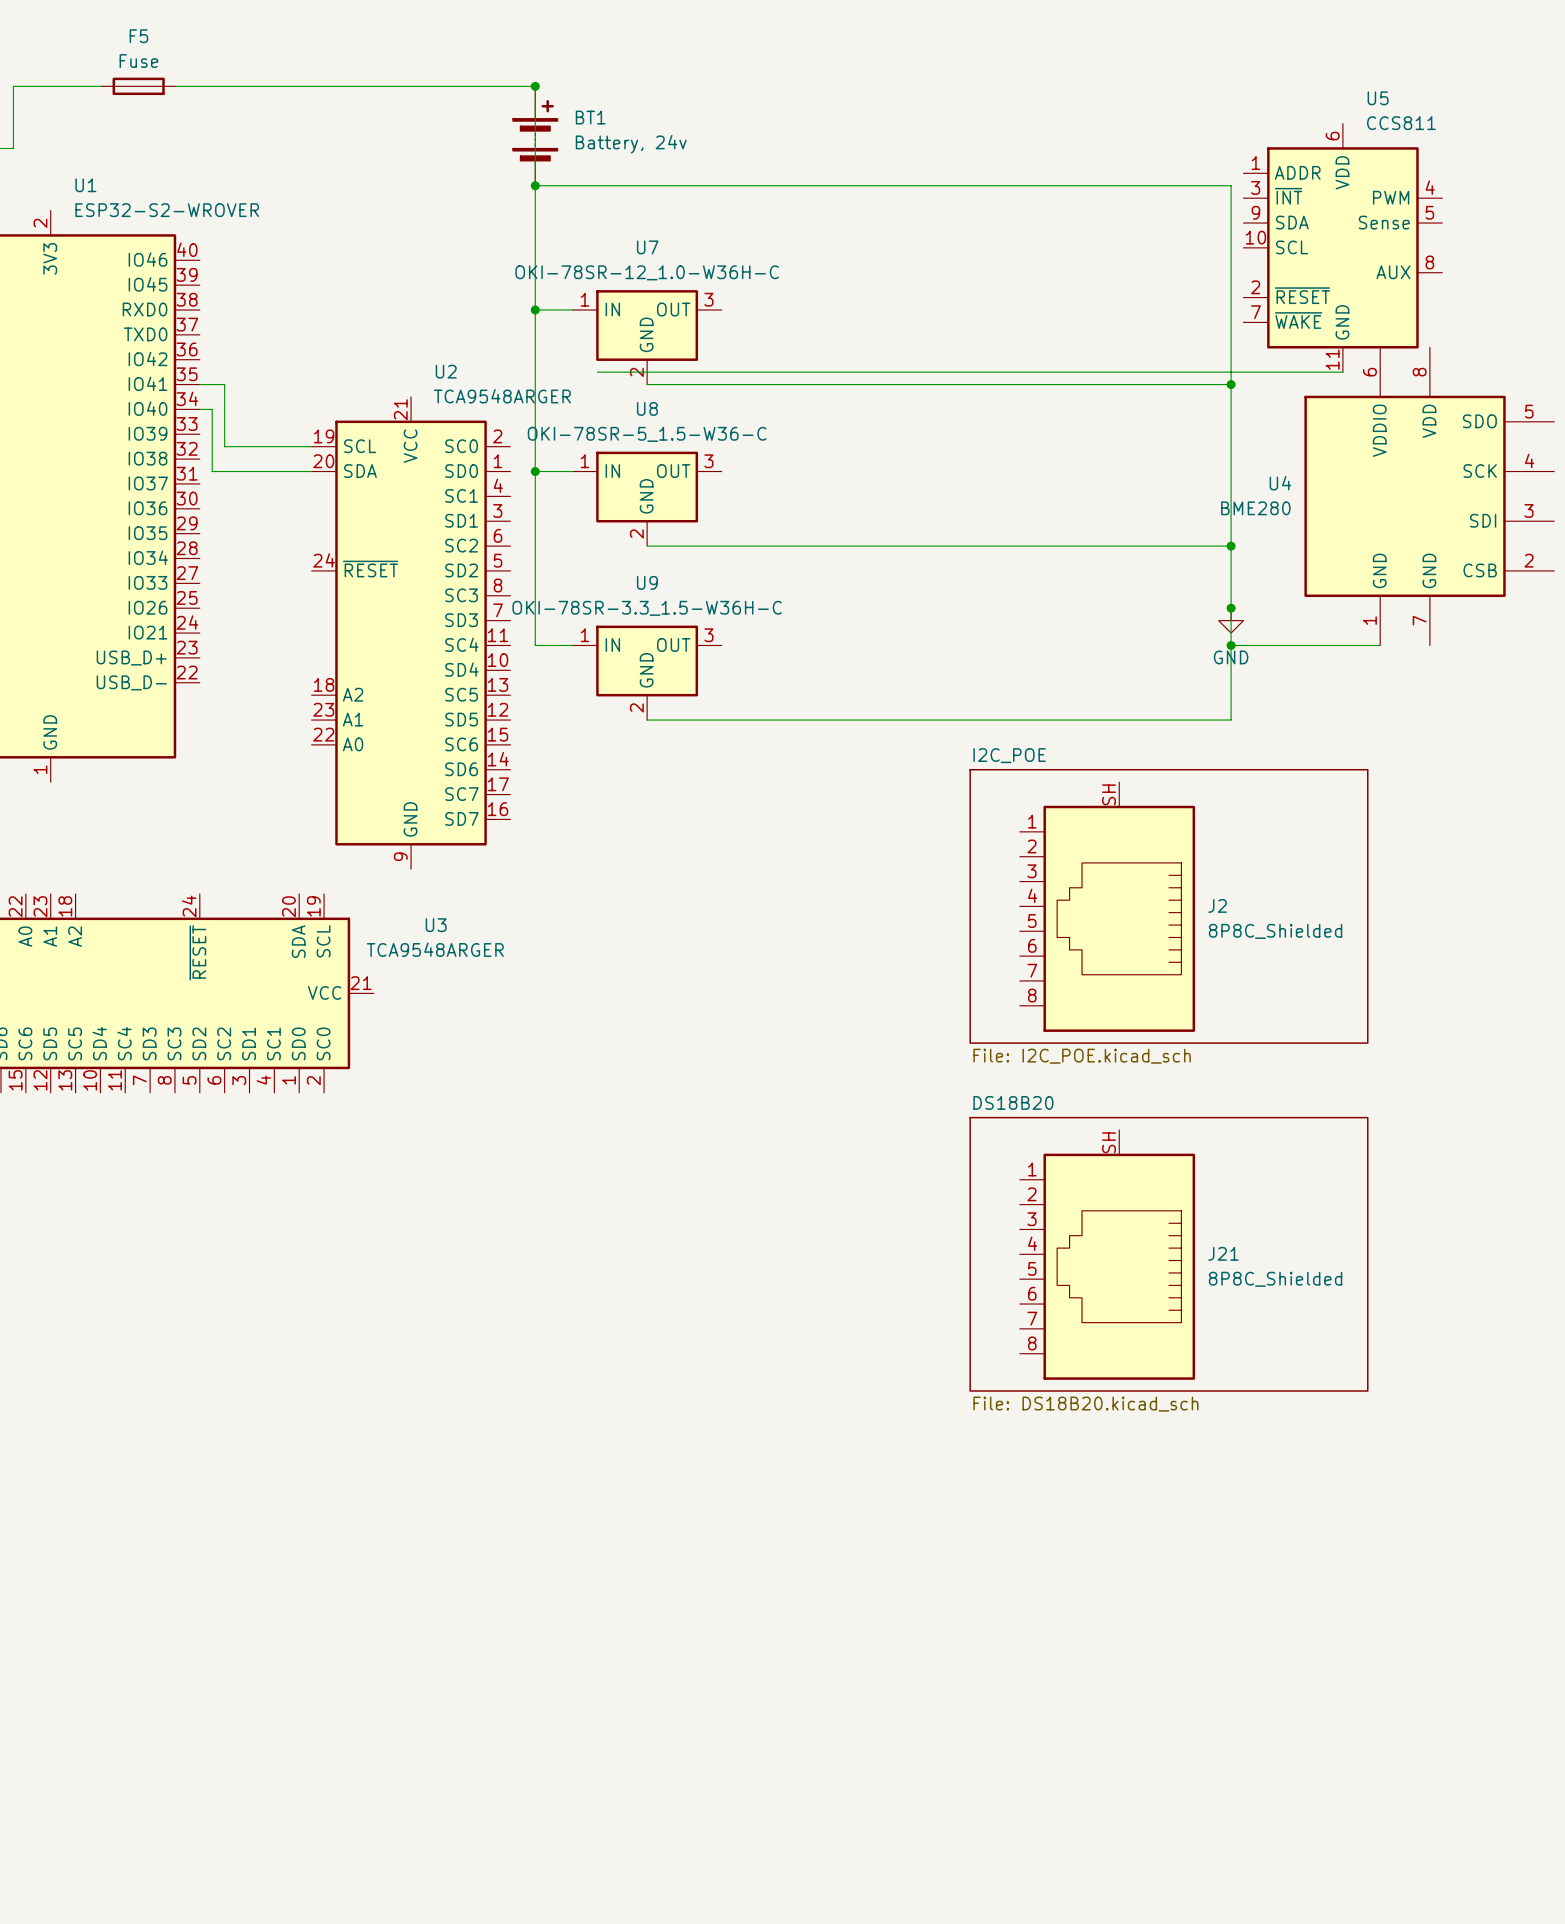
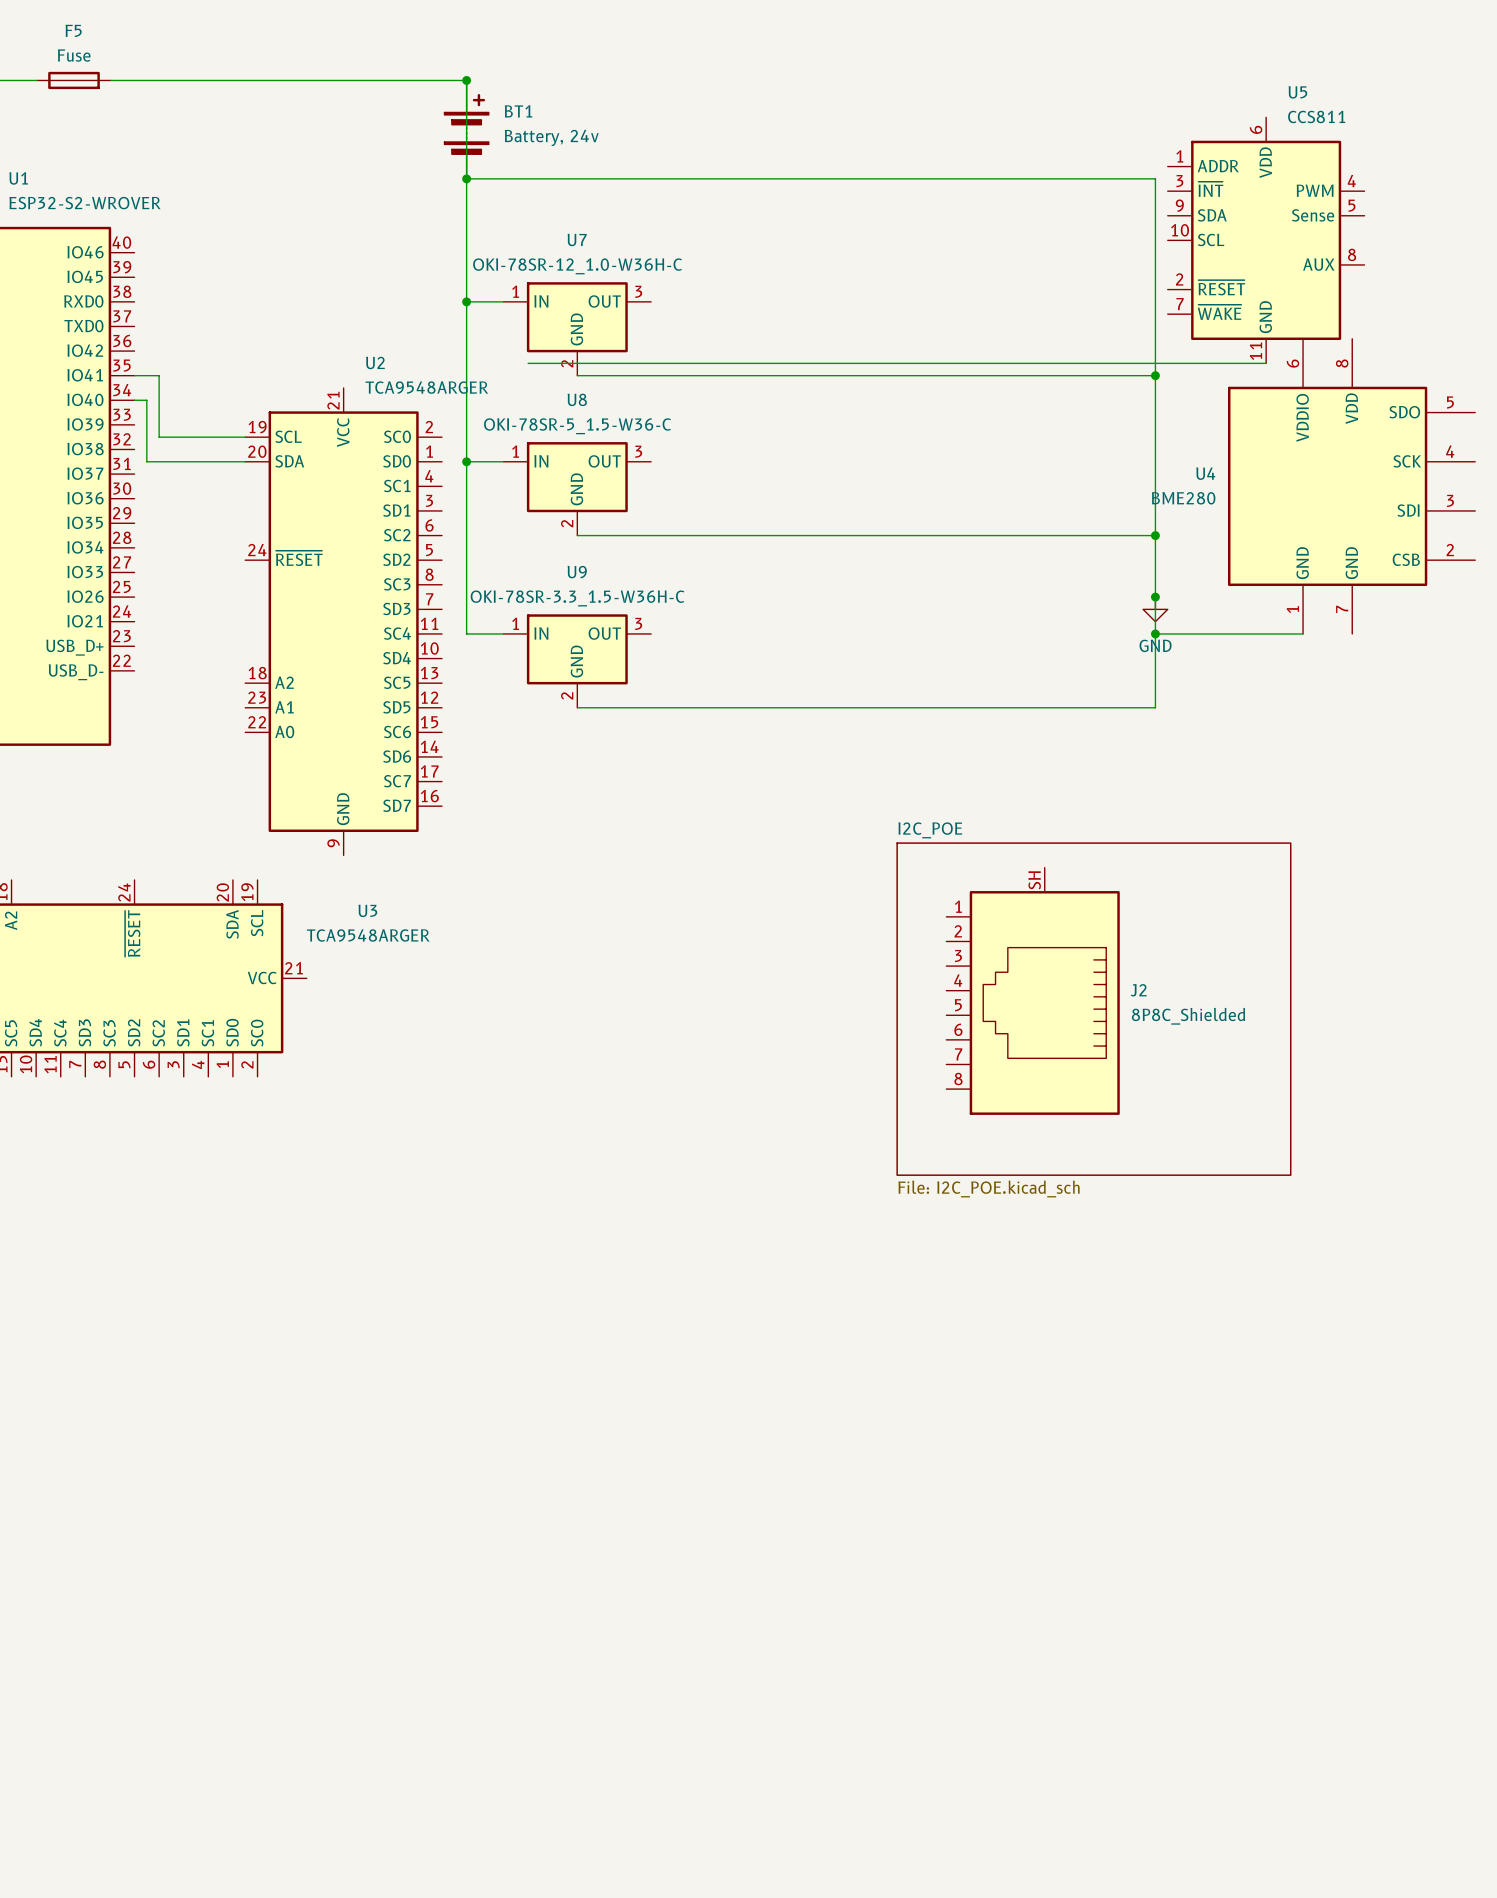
sheet I2C_POE name position: I2C_POE (1009, 755) -> I2C_POE (930, 830)
sheet I2C_POE shape: [969, 768, 1369, 1044] -> [896, 842, 1292, 1176]
J2 position: (1107, 907) -> (1033, 991)
sheet I2C_POE value position: File: I2C_POE.kicad_sch (1082, 1056) -> File: I2C_POE.kicad_sch (989, 1189)
J21: 8P8C_Shielded (1107, 1254) -> none
sheet DS18B20: File: DS18B20.kicad_sch (1168, 1254) -> none

